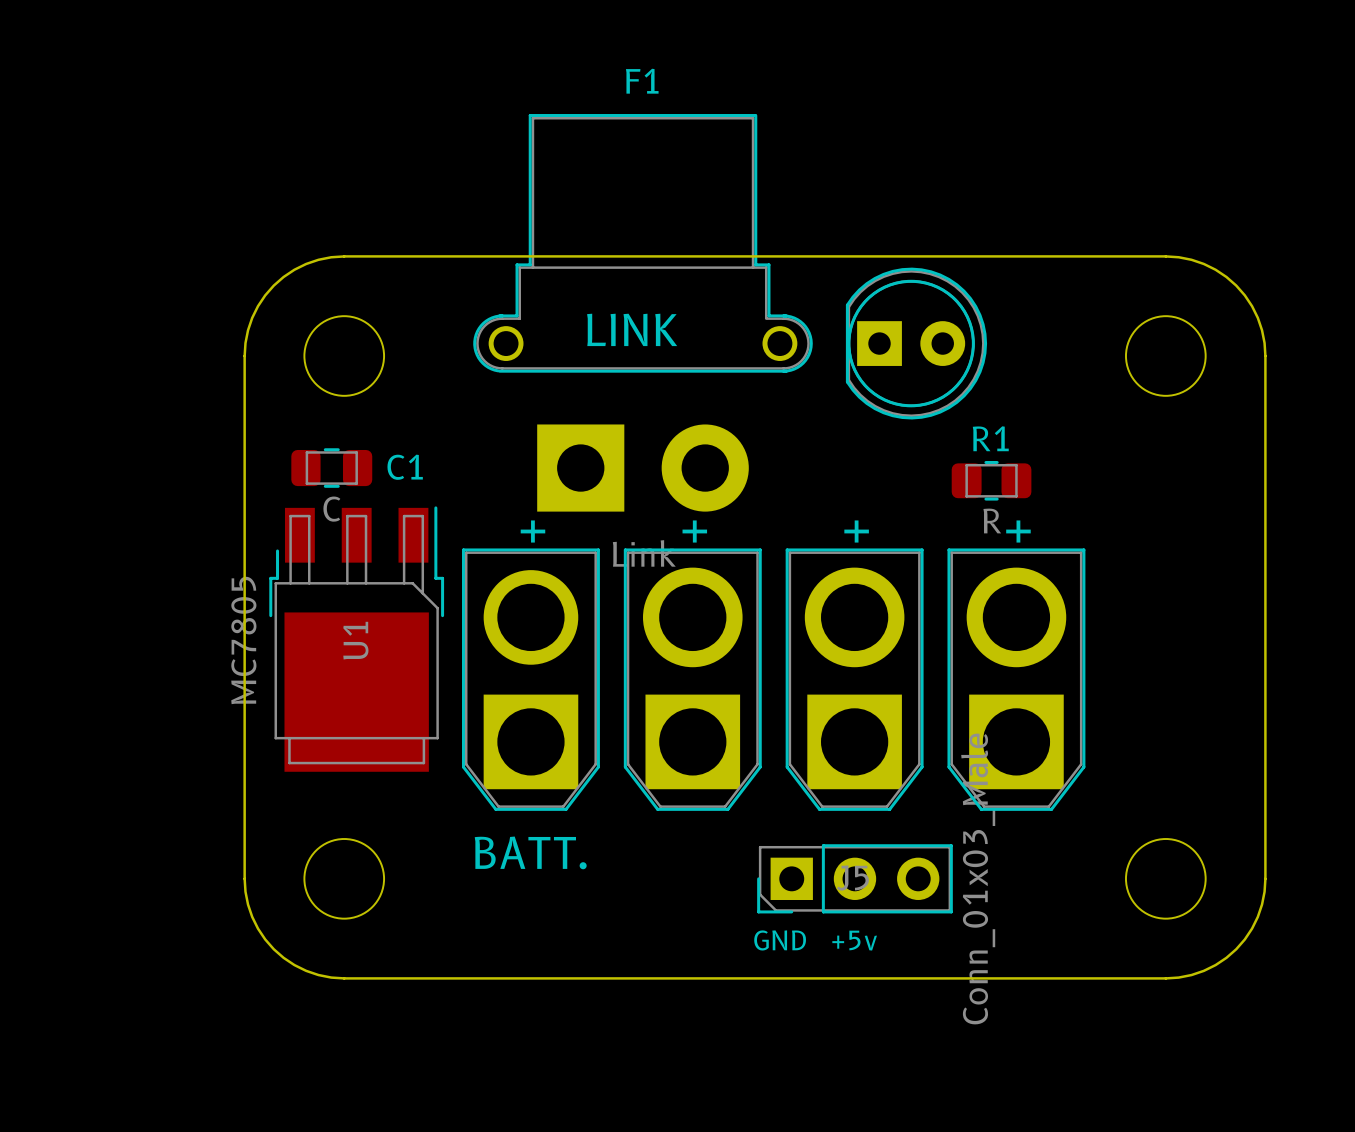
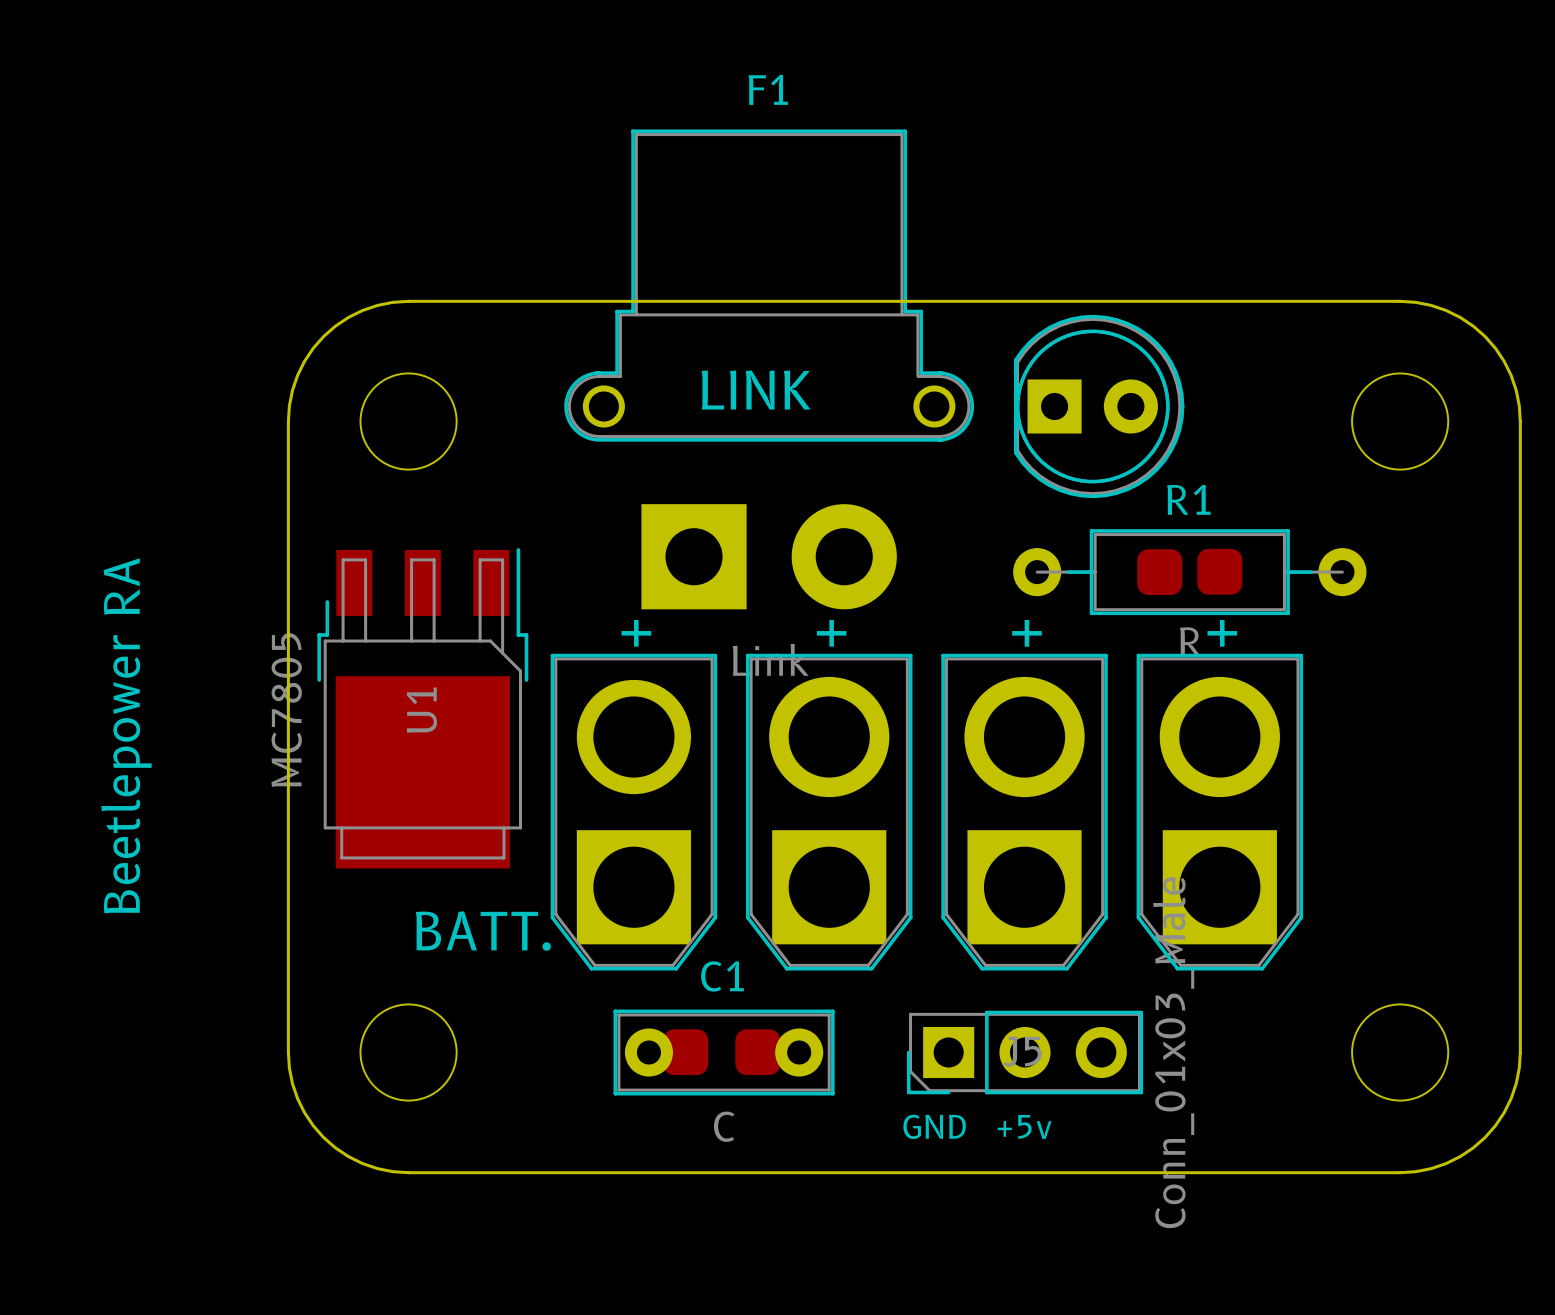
C1 footprint: [291, 448, 373, 488] -> [613, 1009, 835, 1096]
R1 footprint: [951, 460, 1032, 501] -> [1013, 529, 1367, 616]
C1 name position: C1 (405, 467) -> C1 (722, 976)
text: none -> Beetlepower RA (126, 735)
U1 position: (356, 639) -> (422, 708)
text position: BATT. (530, 852) -> BATT. (483, 931)

